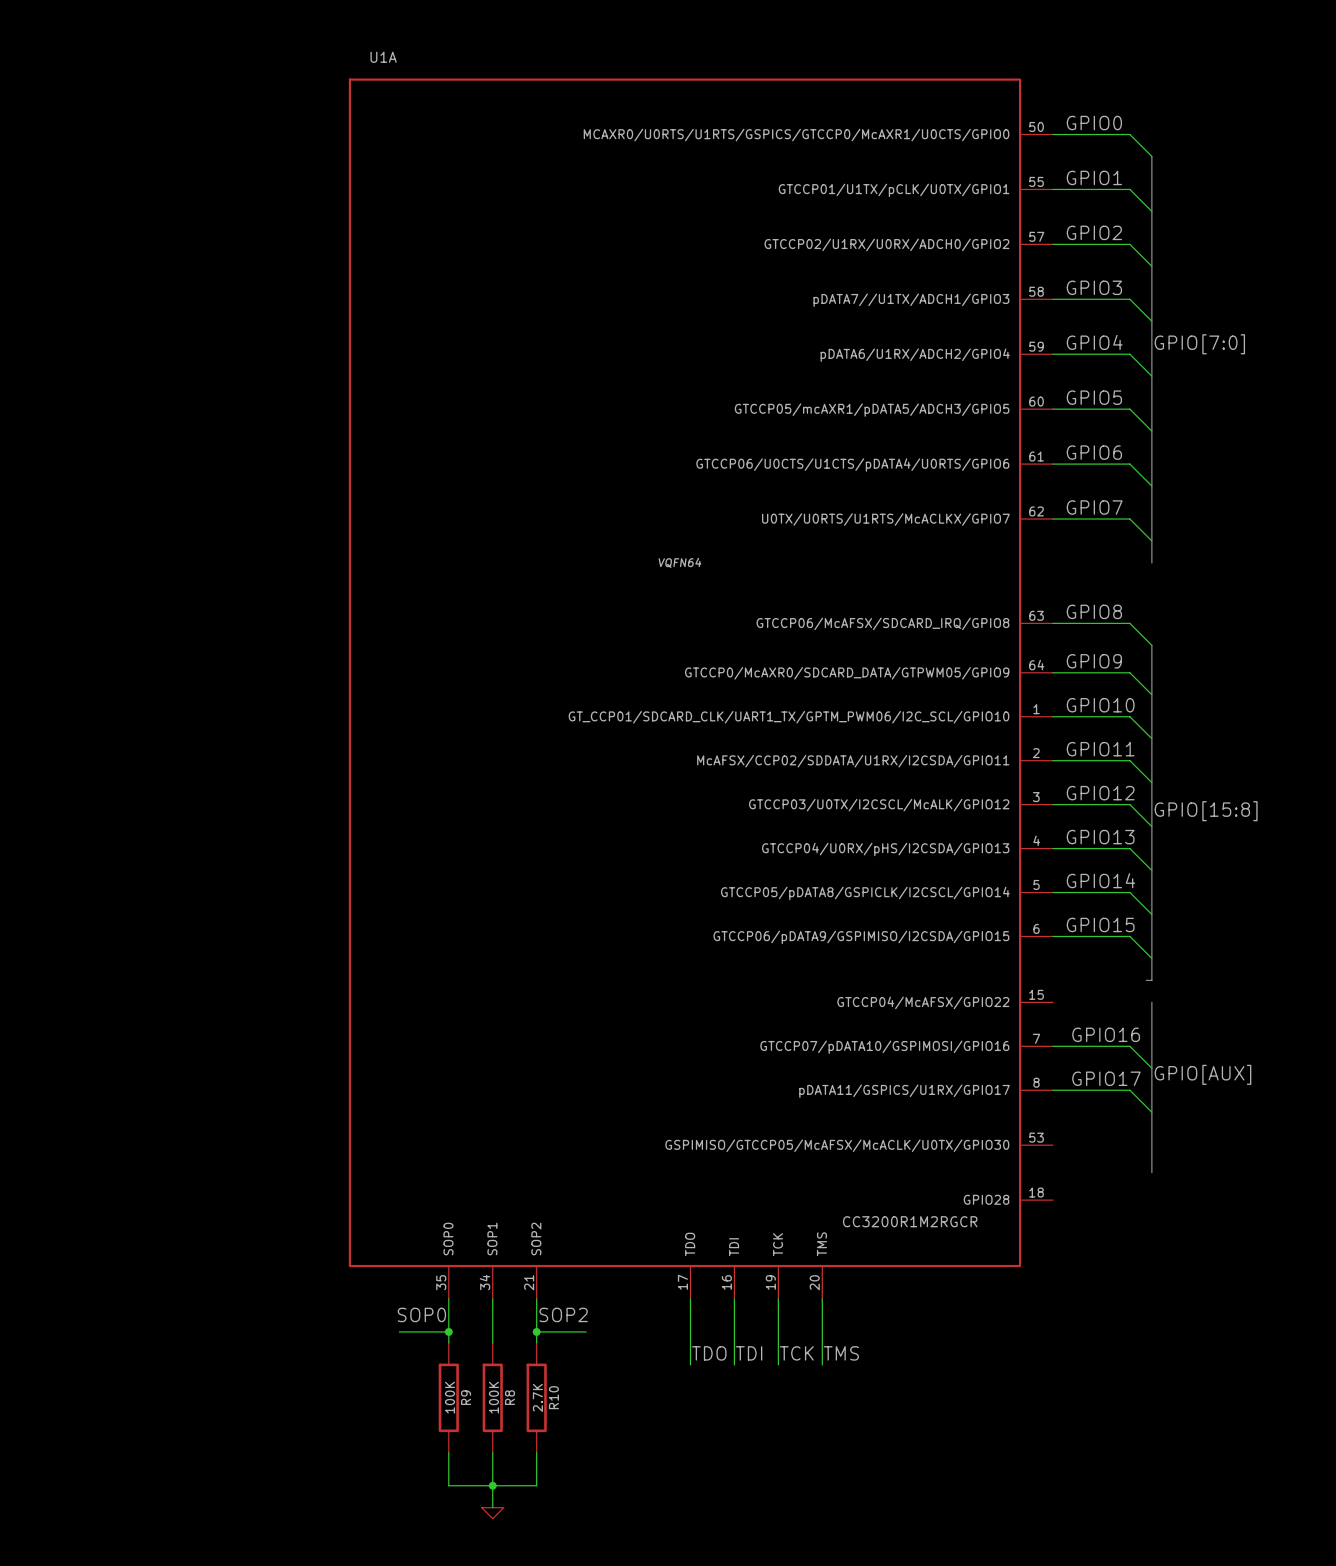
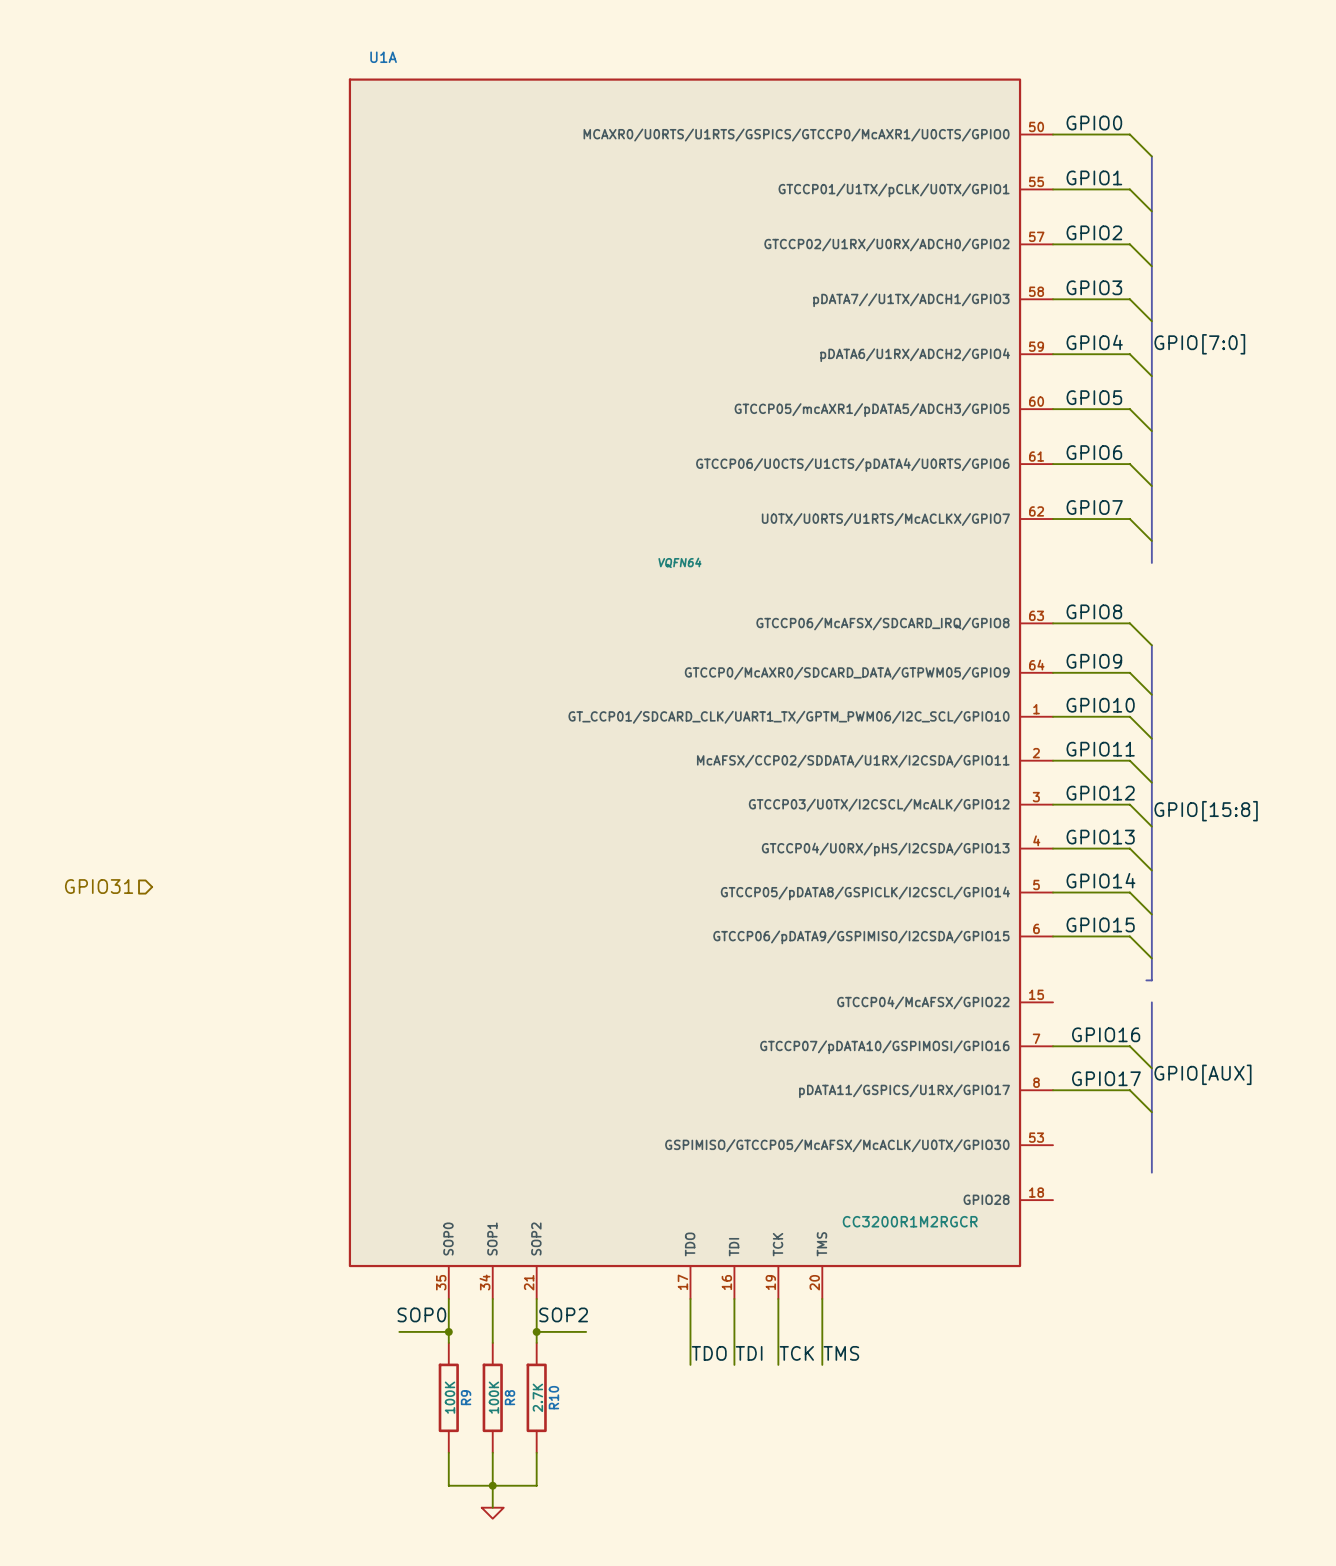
hierarchical label: none -> GPIO31 (99, 886)

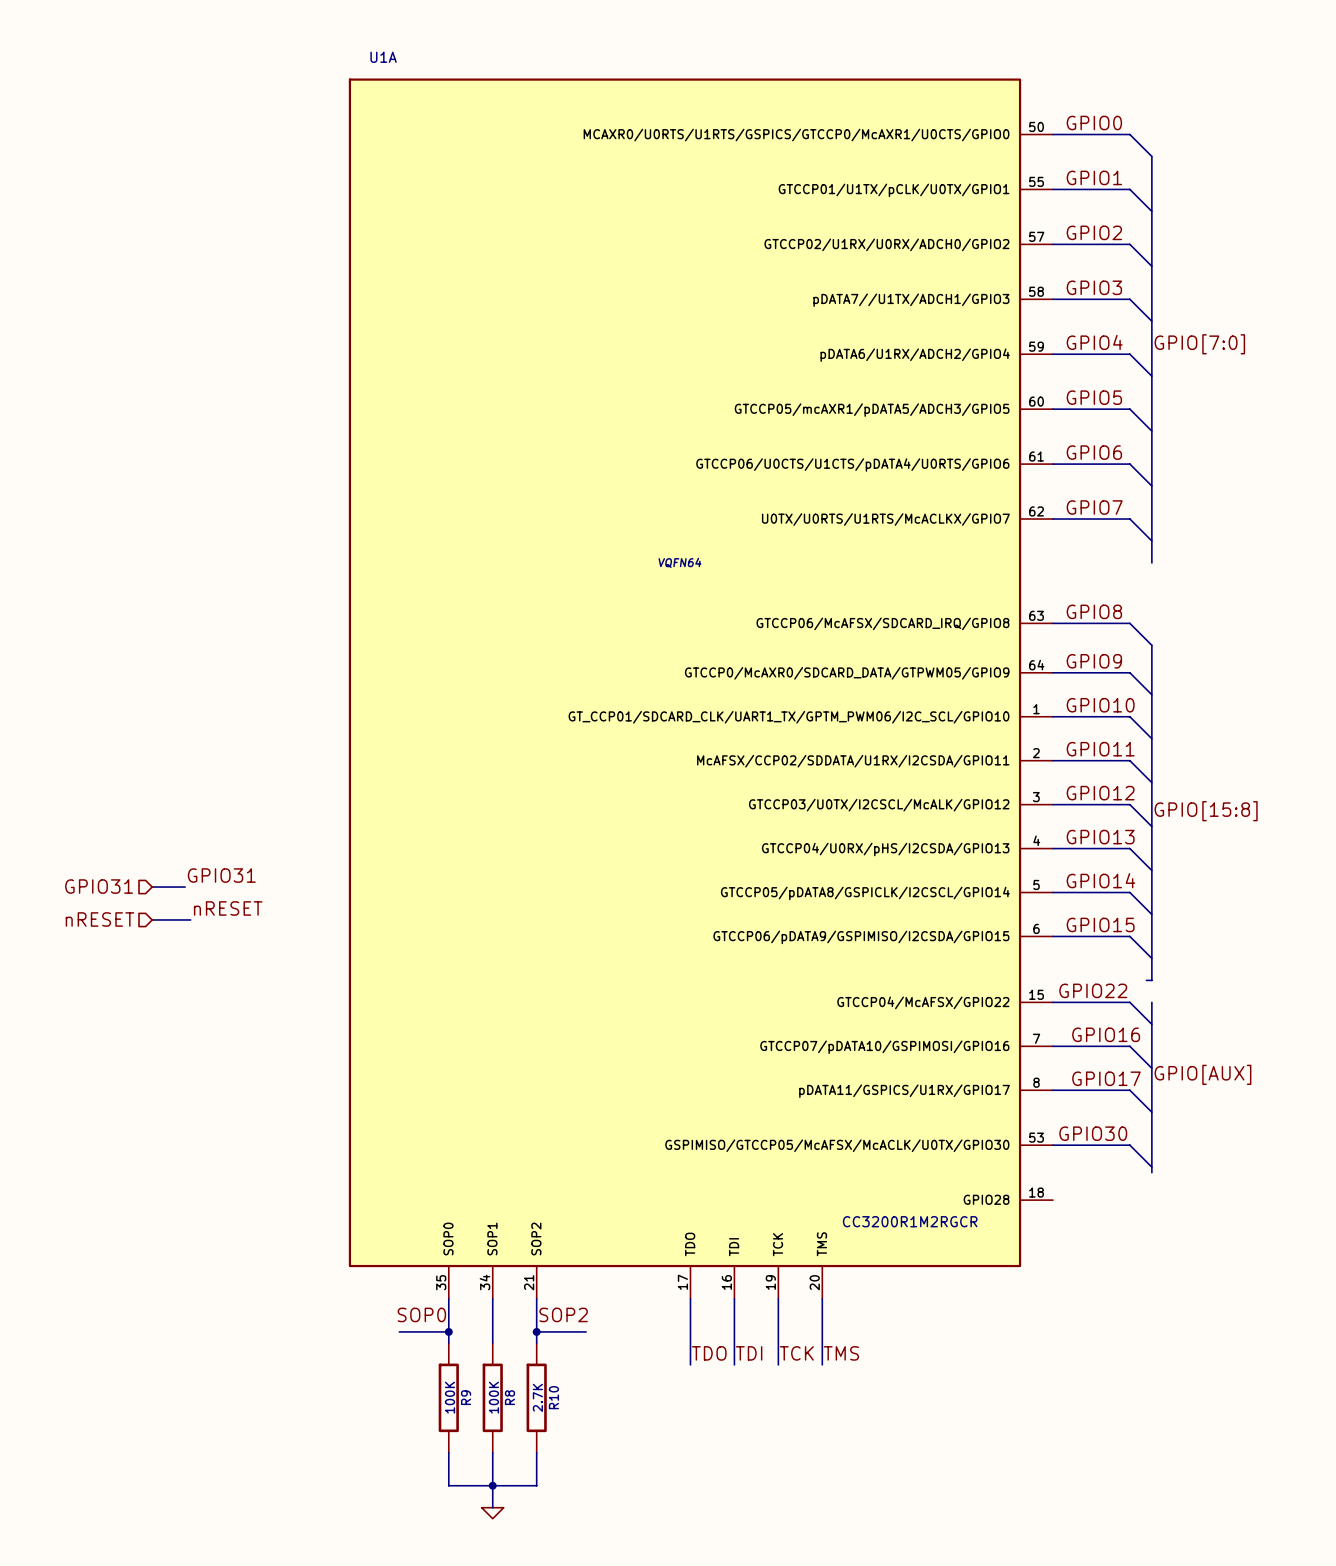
label: none -> GPIO31 (221, 875)
wire: none -> (152, 887) (185, 887)
label: none -> nRESET (228, 908)
hierarchical label: none -> nRESET (100, 919)
wire: none -> (152, 919) (190, 919)
label: none -> GPIO22 (1093, 990)
wire: none -> (1053, 1002) (1129, 1002) (1151, 1024)
label: none -> GPIO30 (1093, 1133)
wire: none -> (1053, 1145) (1129, 1145) (1151, 1167)

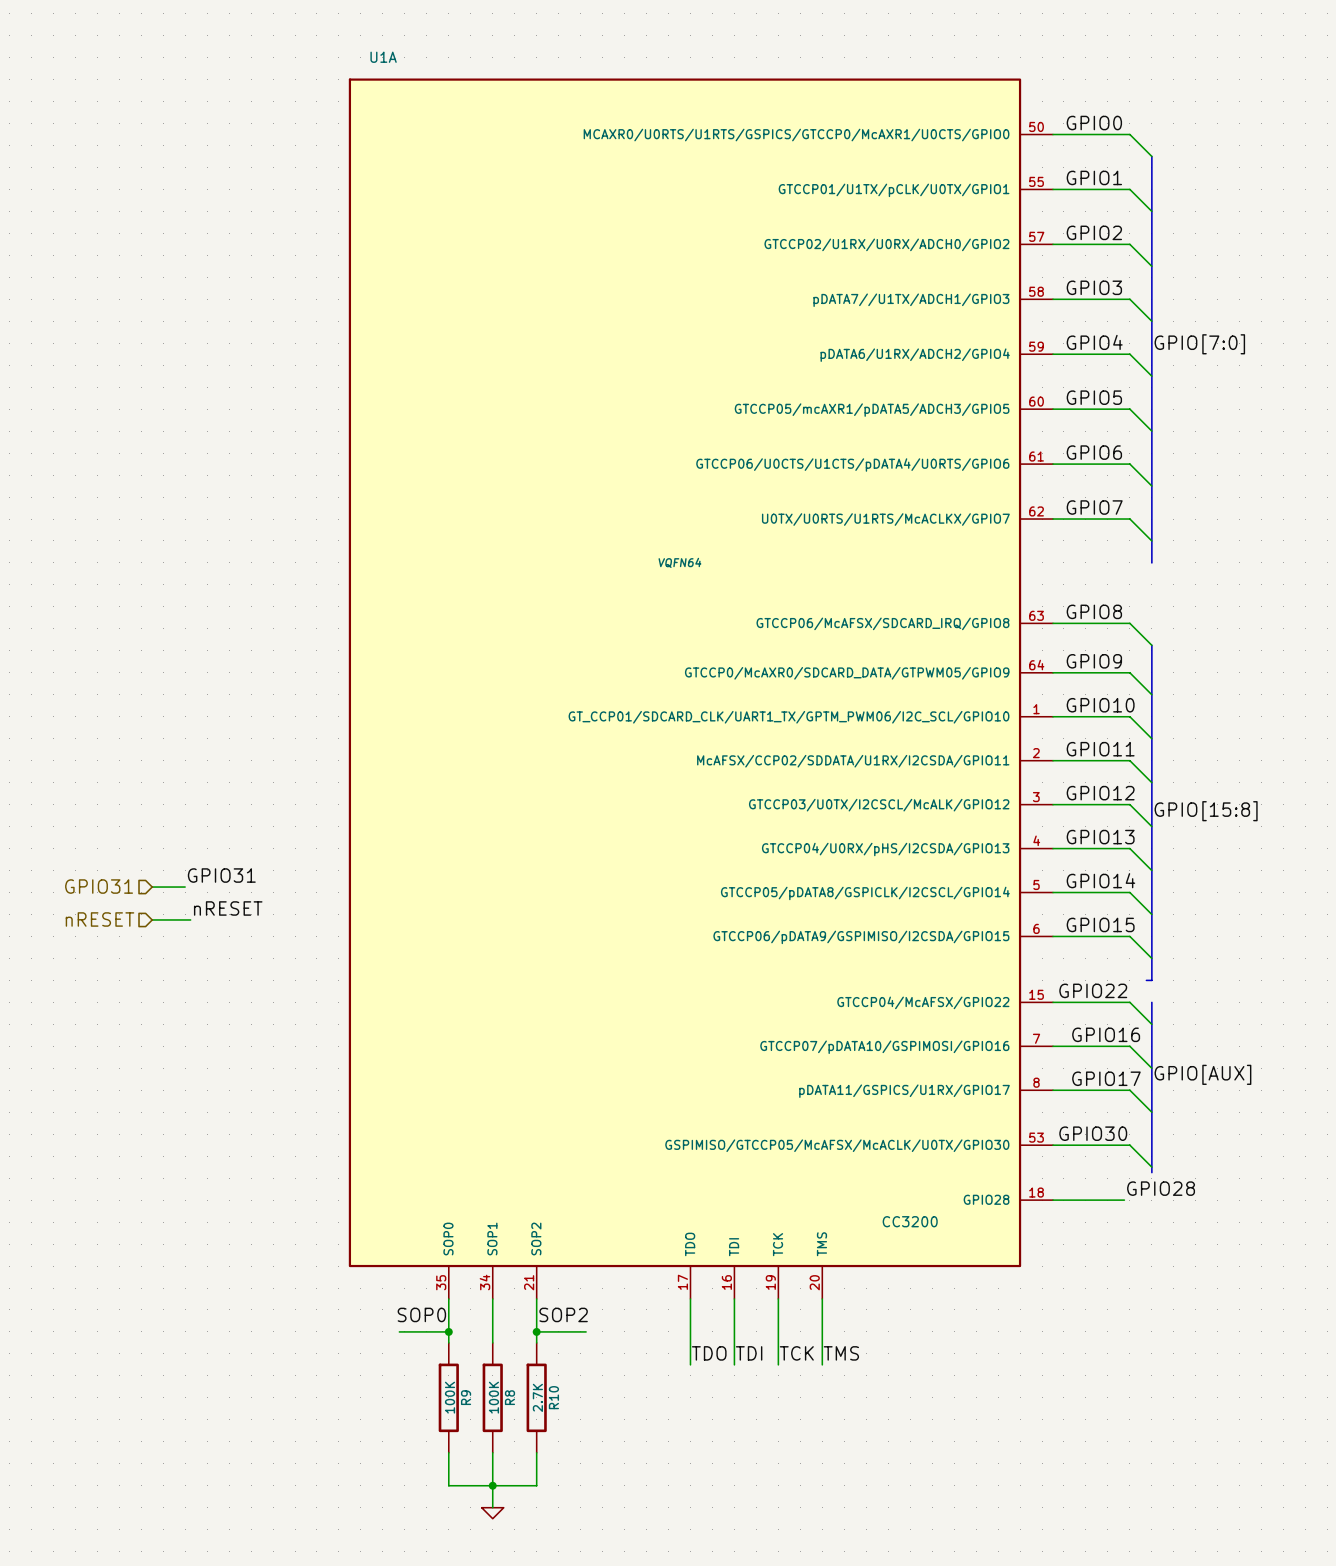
label: none -> GPIO28 (1161, 1188)
wire: none -> (1053, 1200) (1124, 1200)
U1A value: CC3200R1M2RGCR (910, 1221) -> CC3200 (910, 1221)

